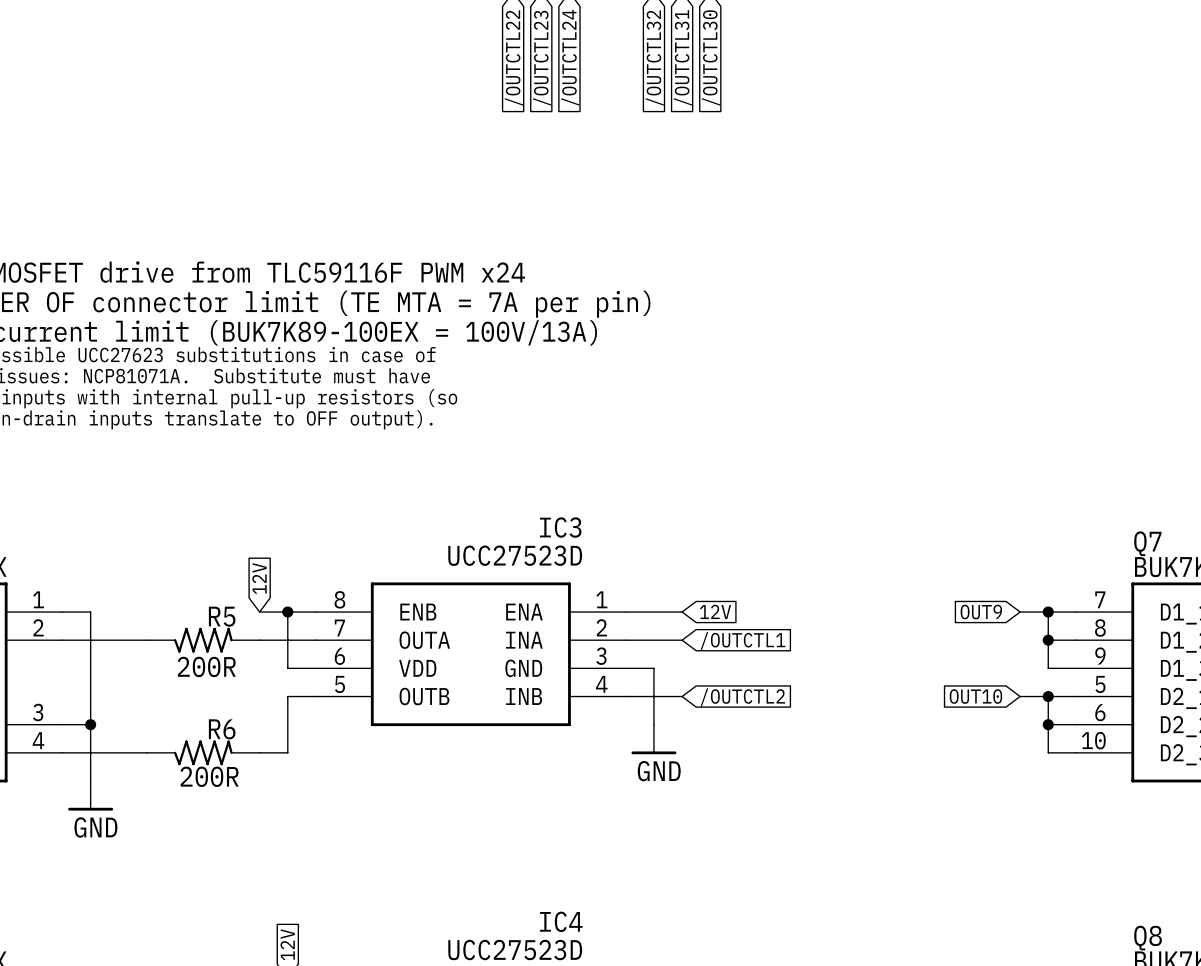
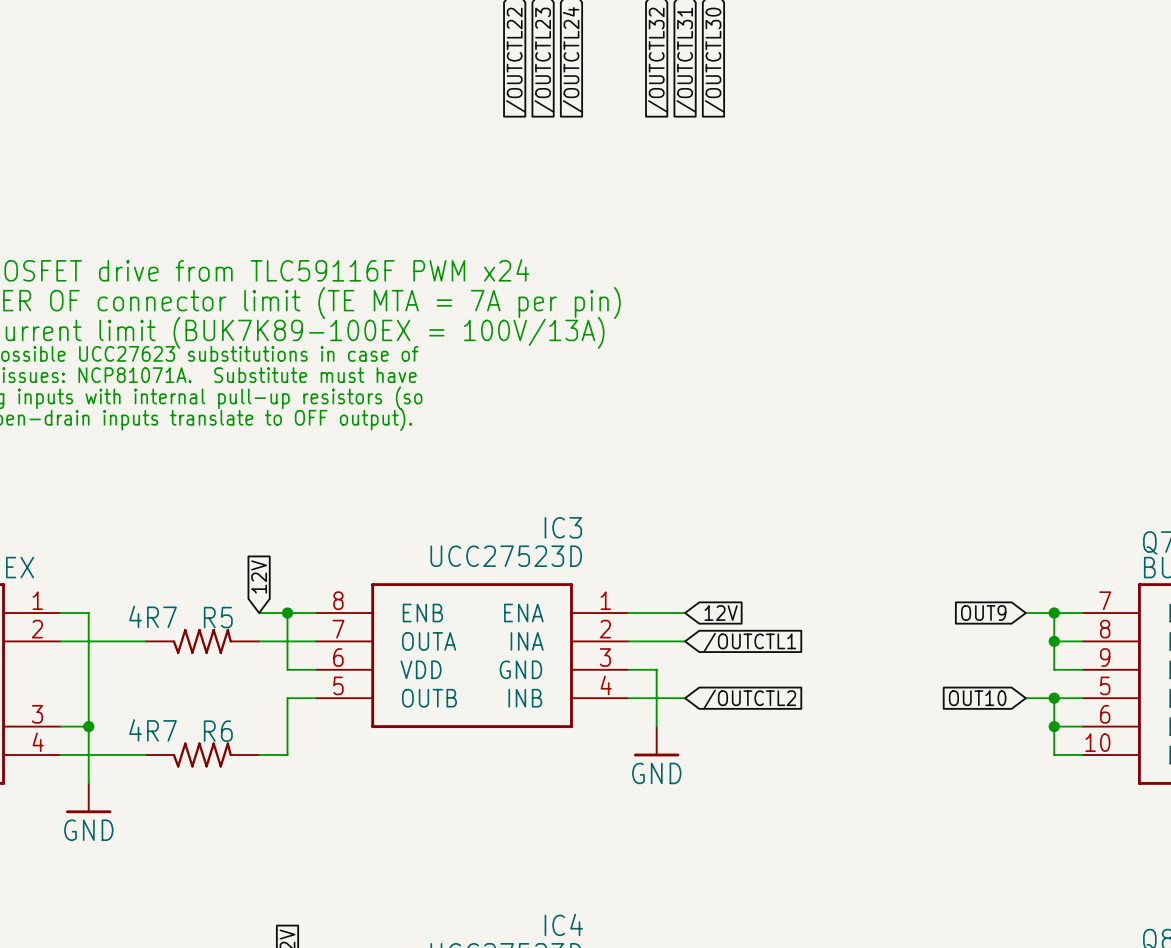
R5 value: 200R (206, 666) -> 4R7 (152, 616)
R6 value: 200R (209, 776) -> 4R7 (152, 730)

